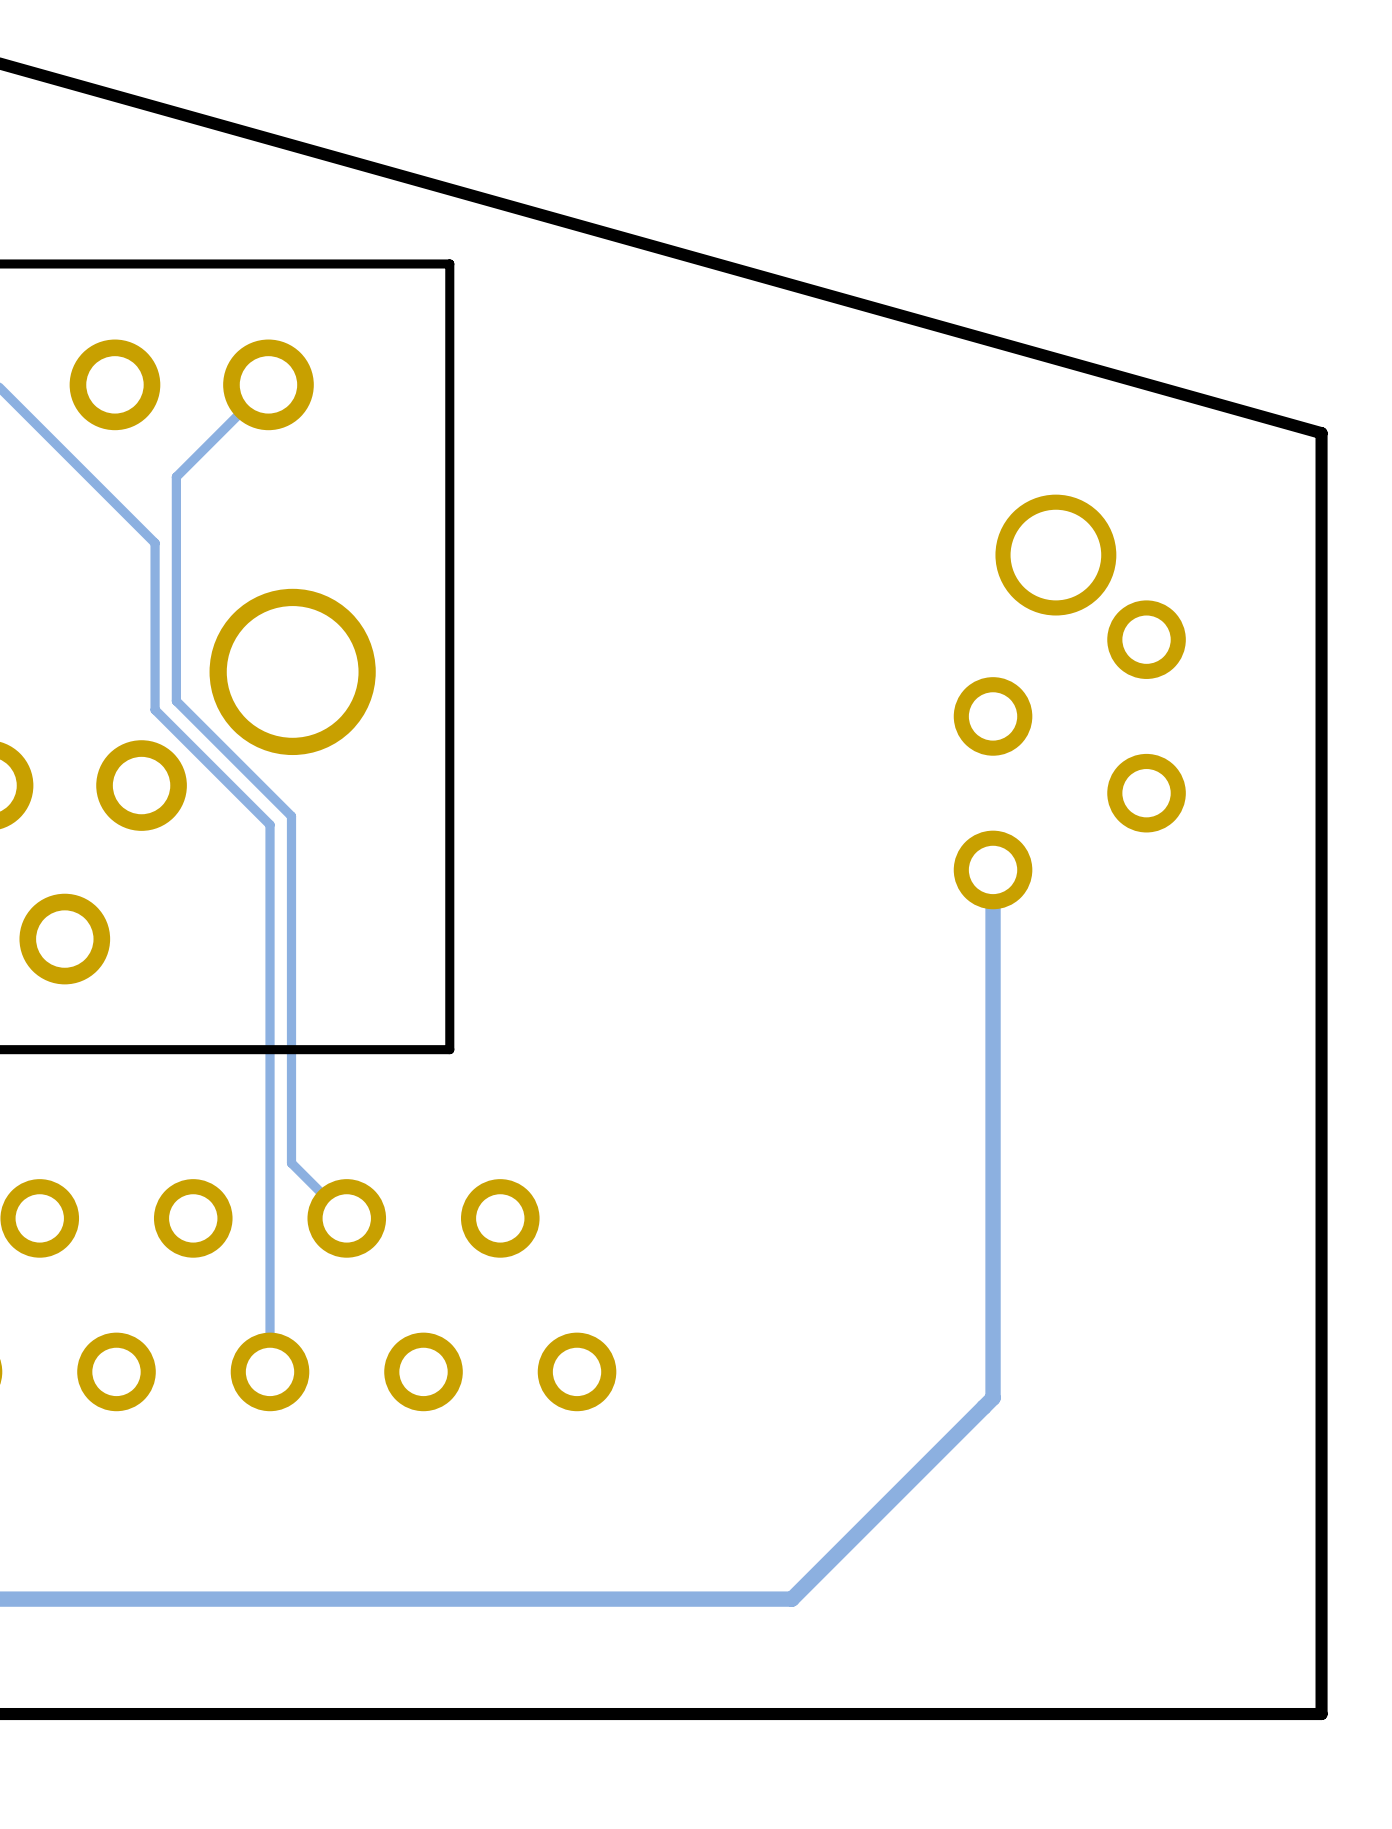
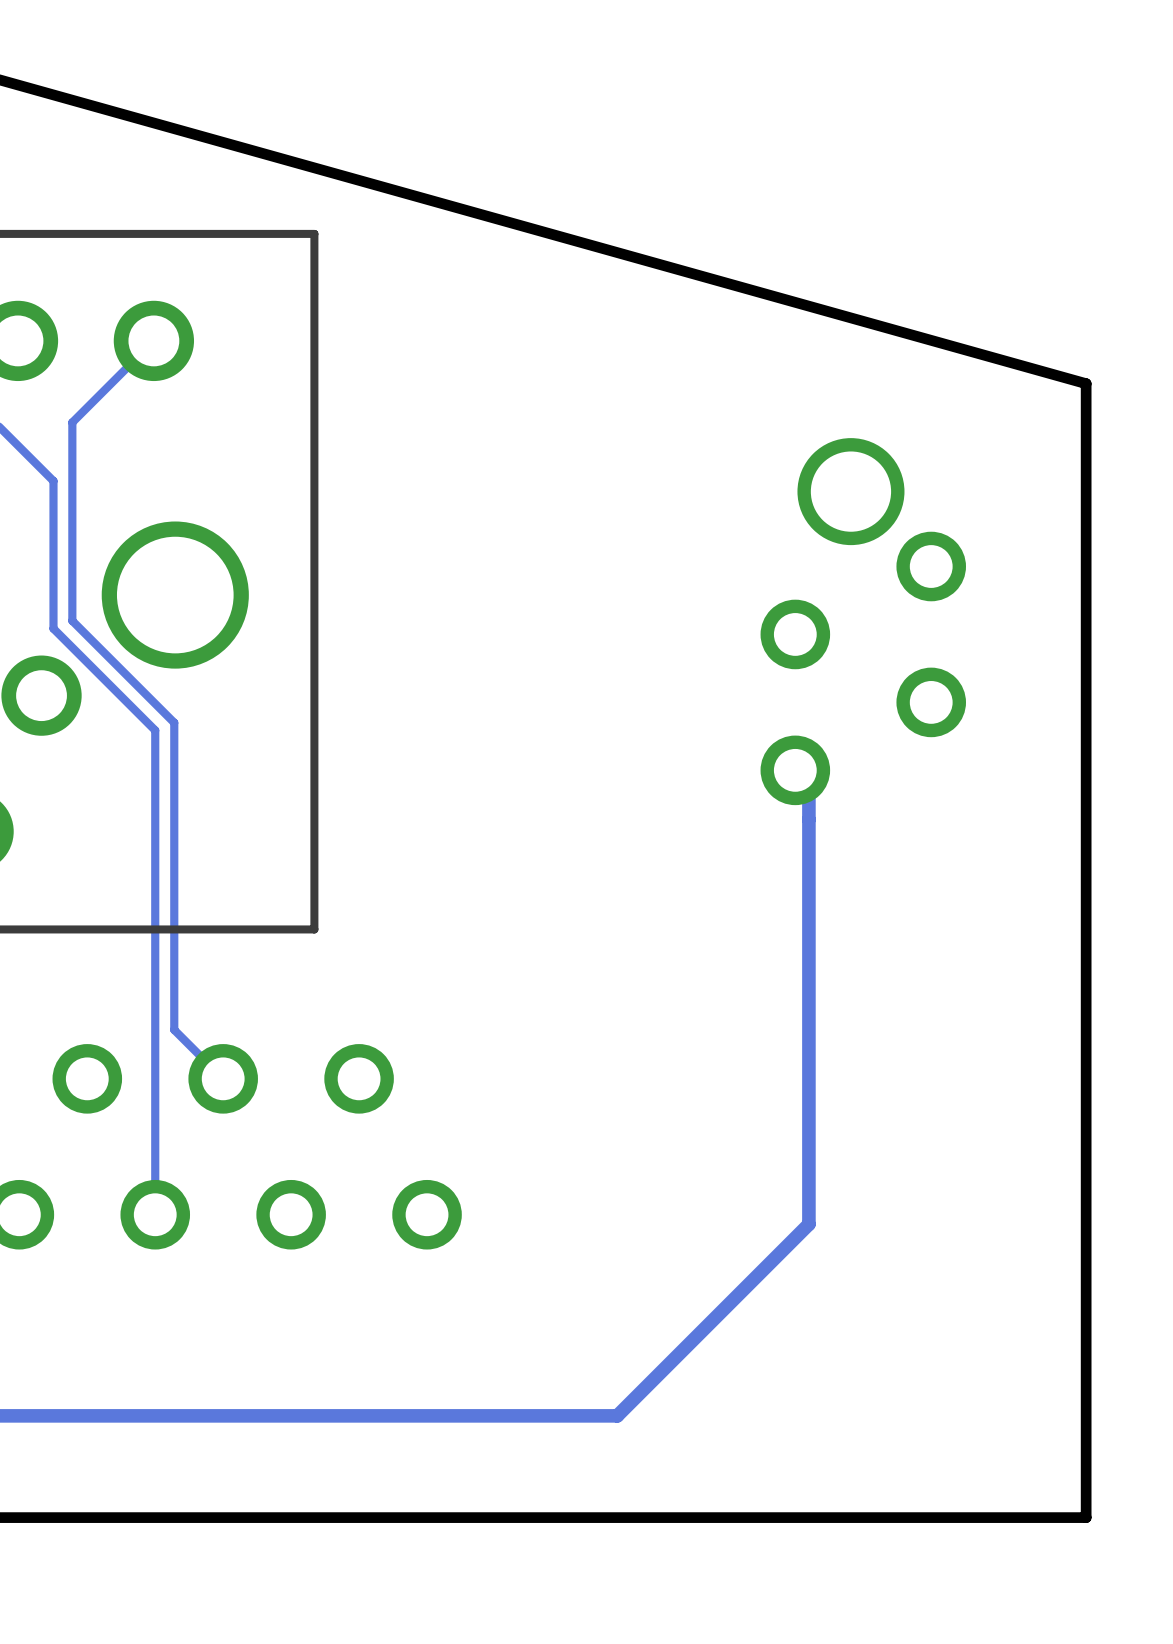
track: (993, 869) (993, 1398) -> (808, 770) (808, 1224) (795, 1237)

